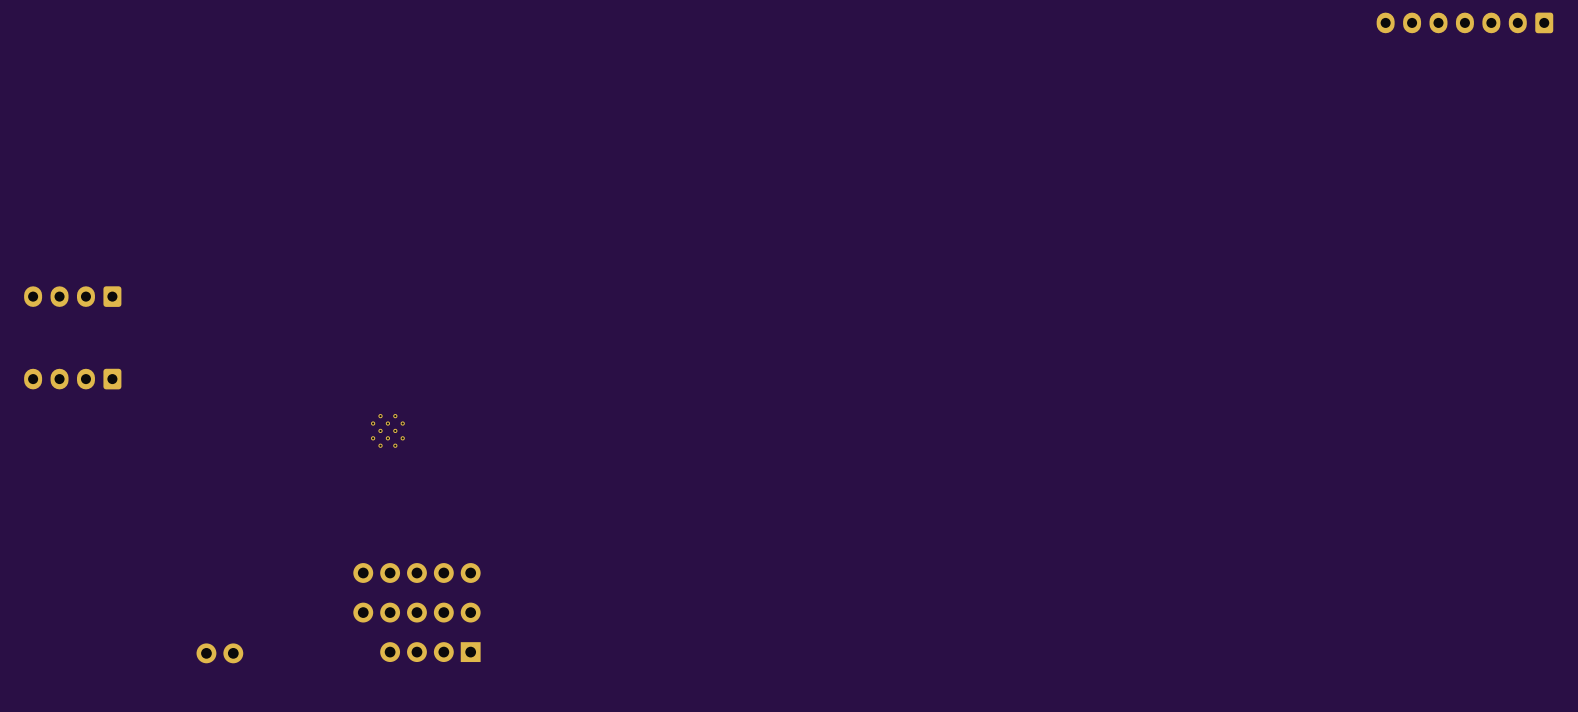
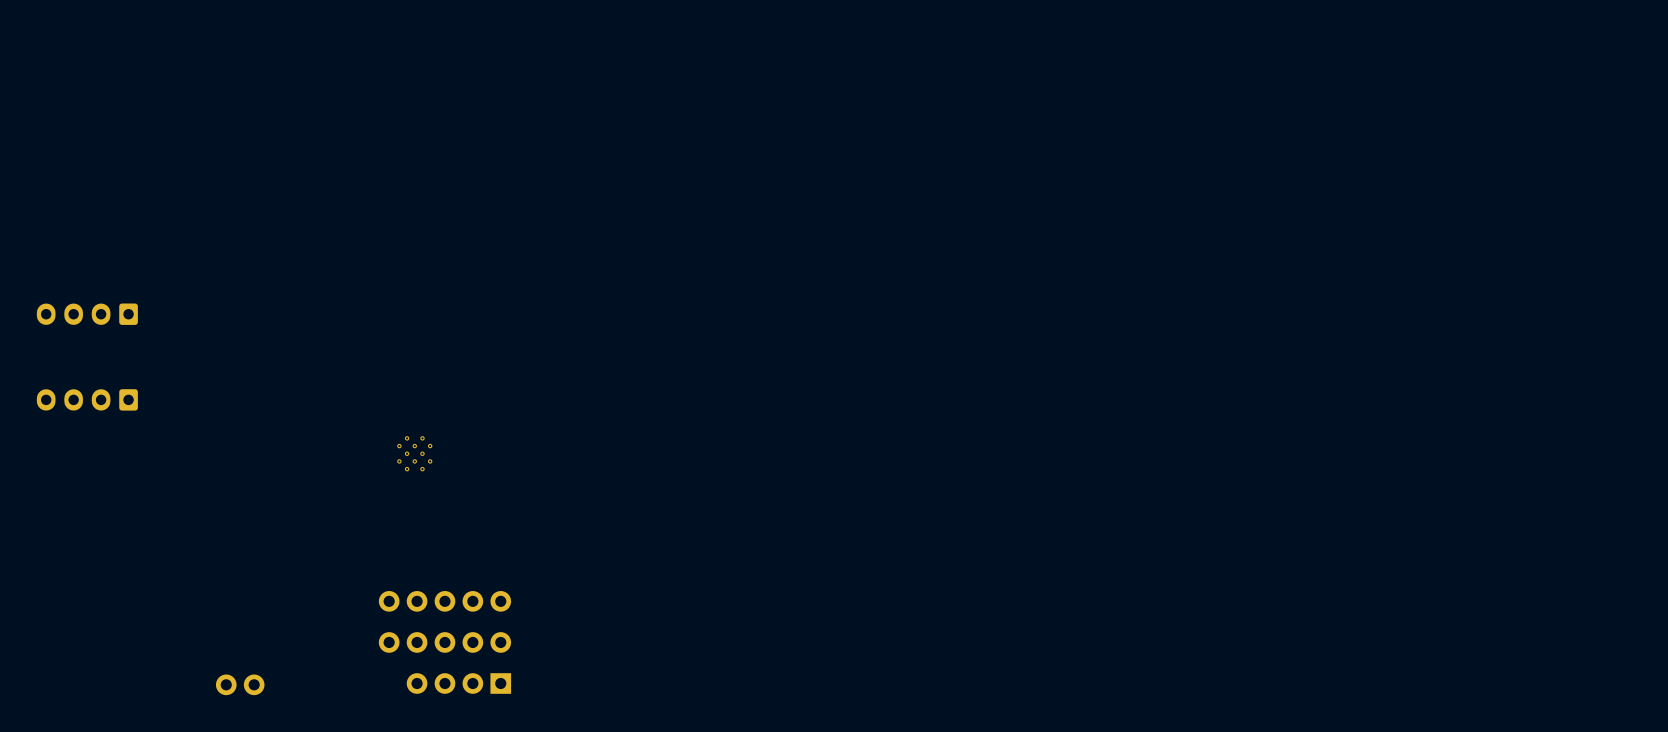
part: (1464, 22) -> none

